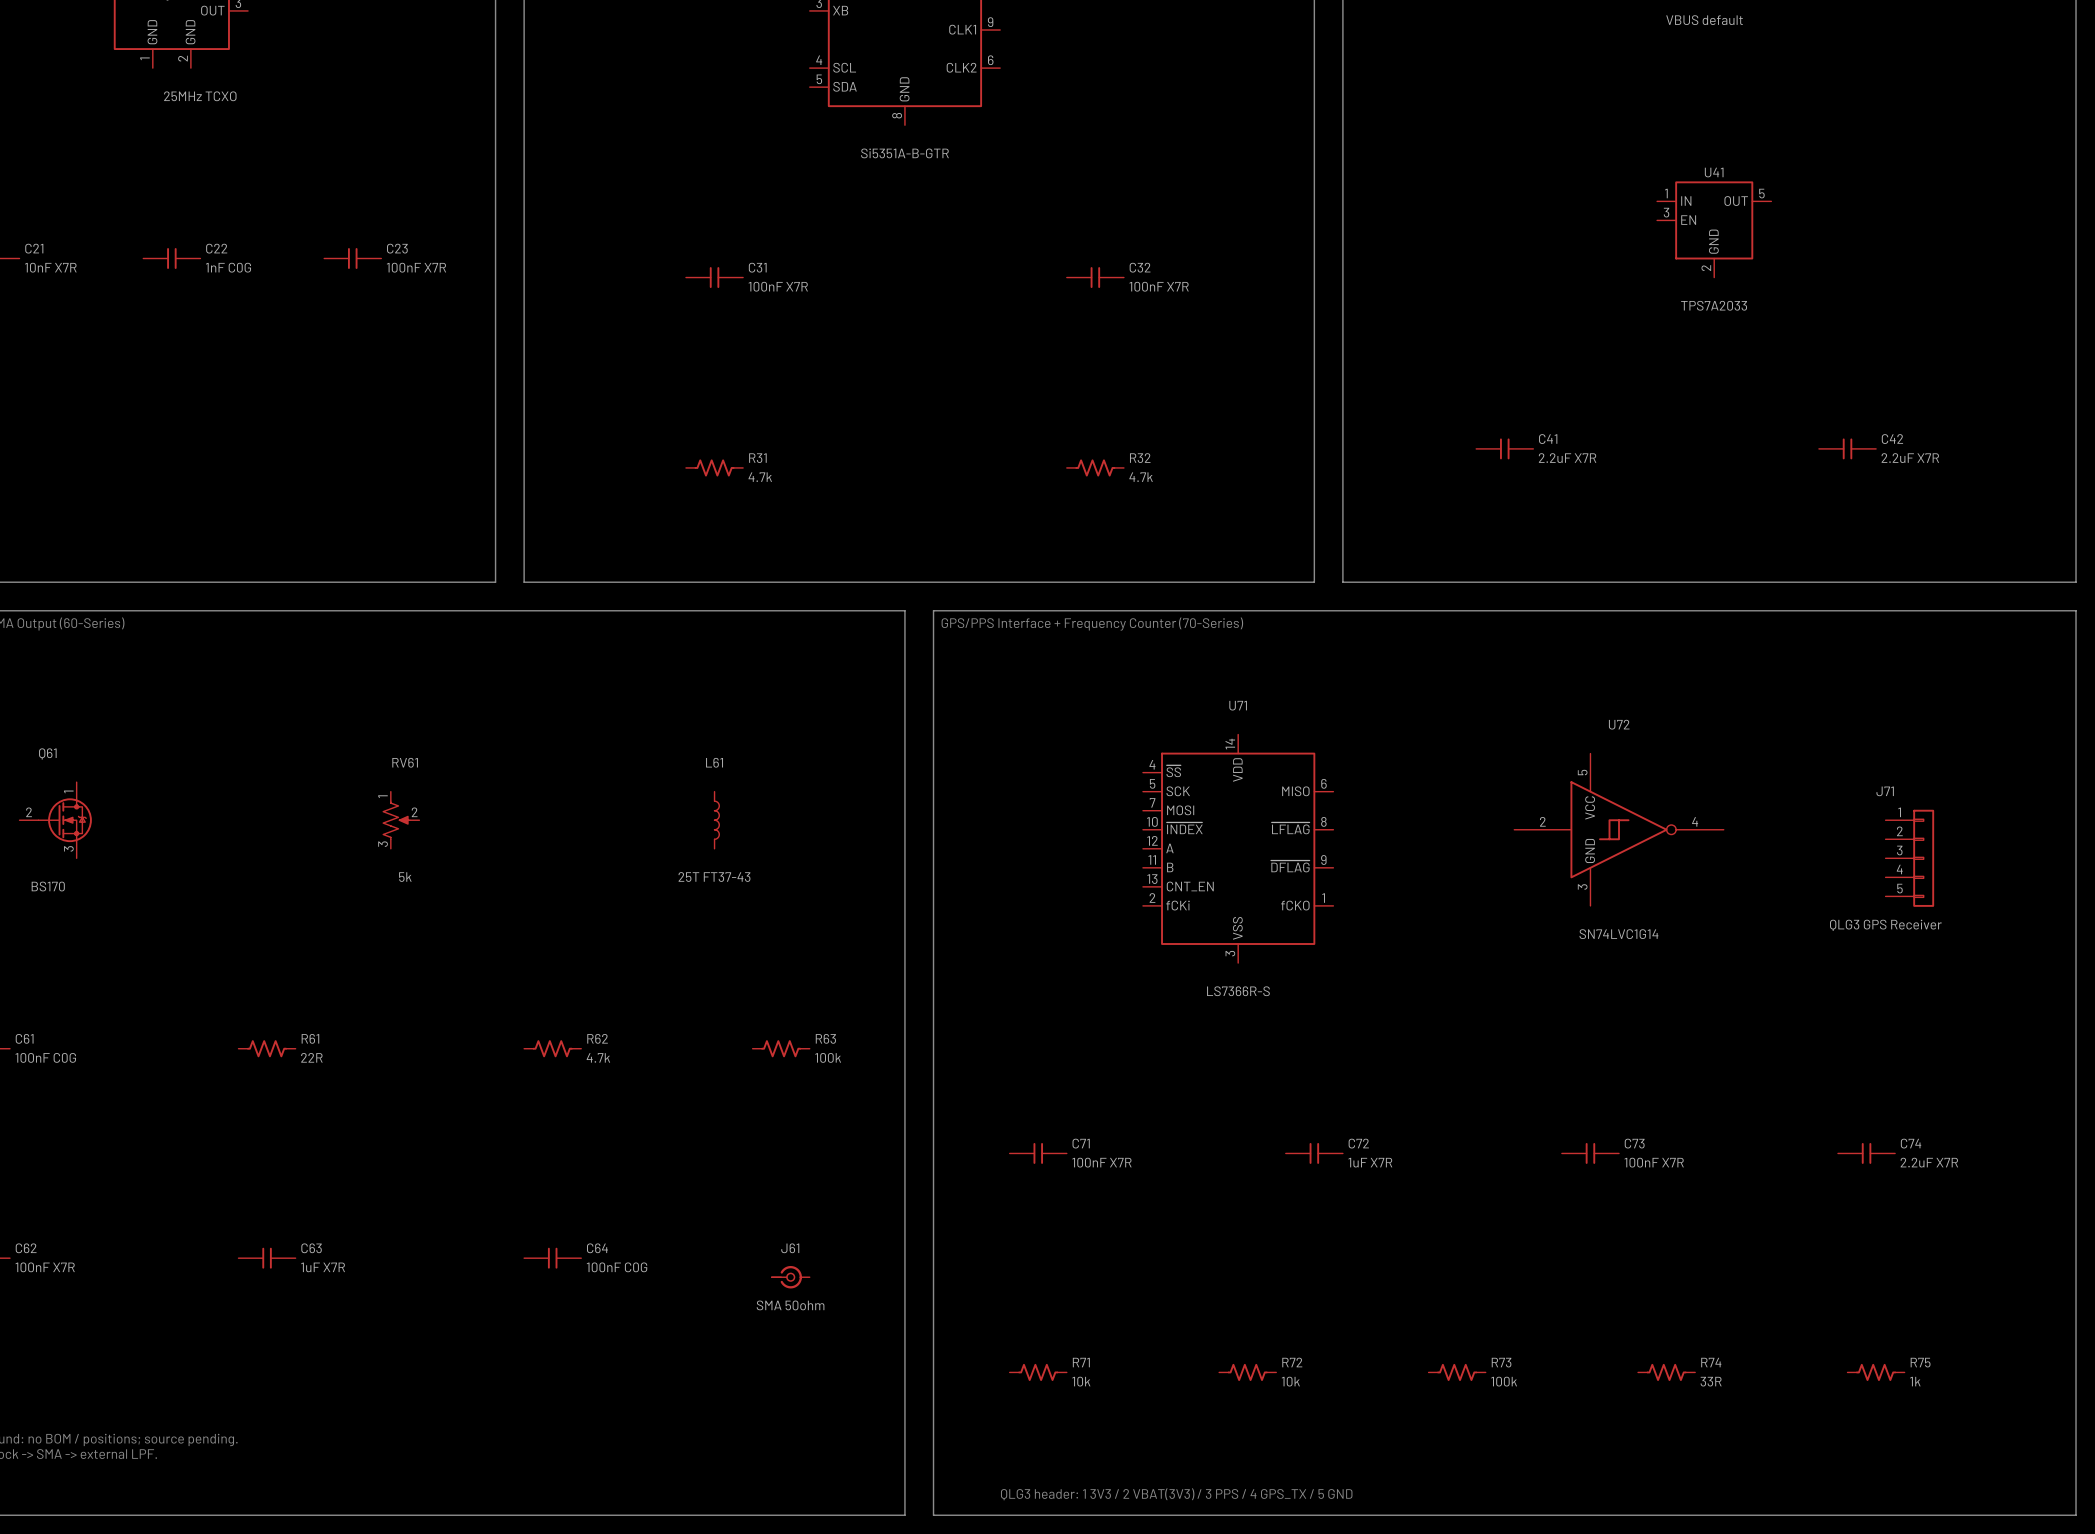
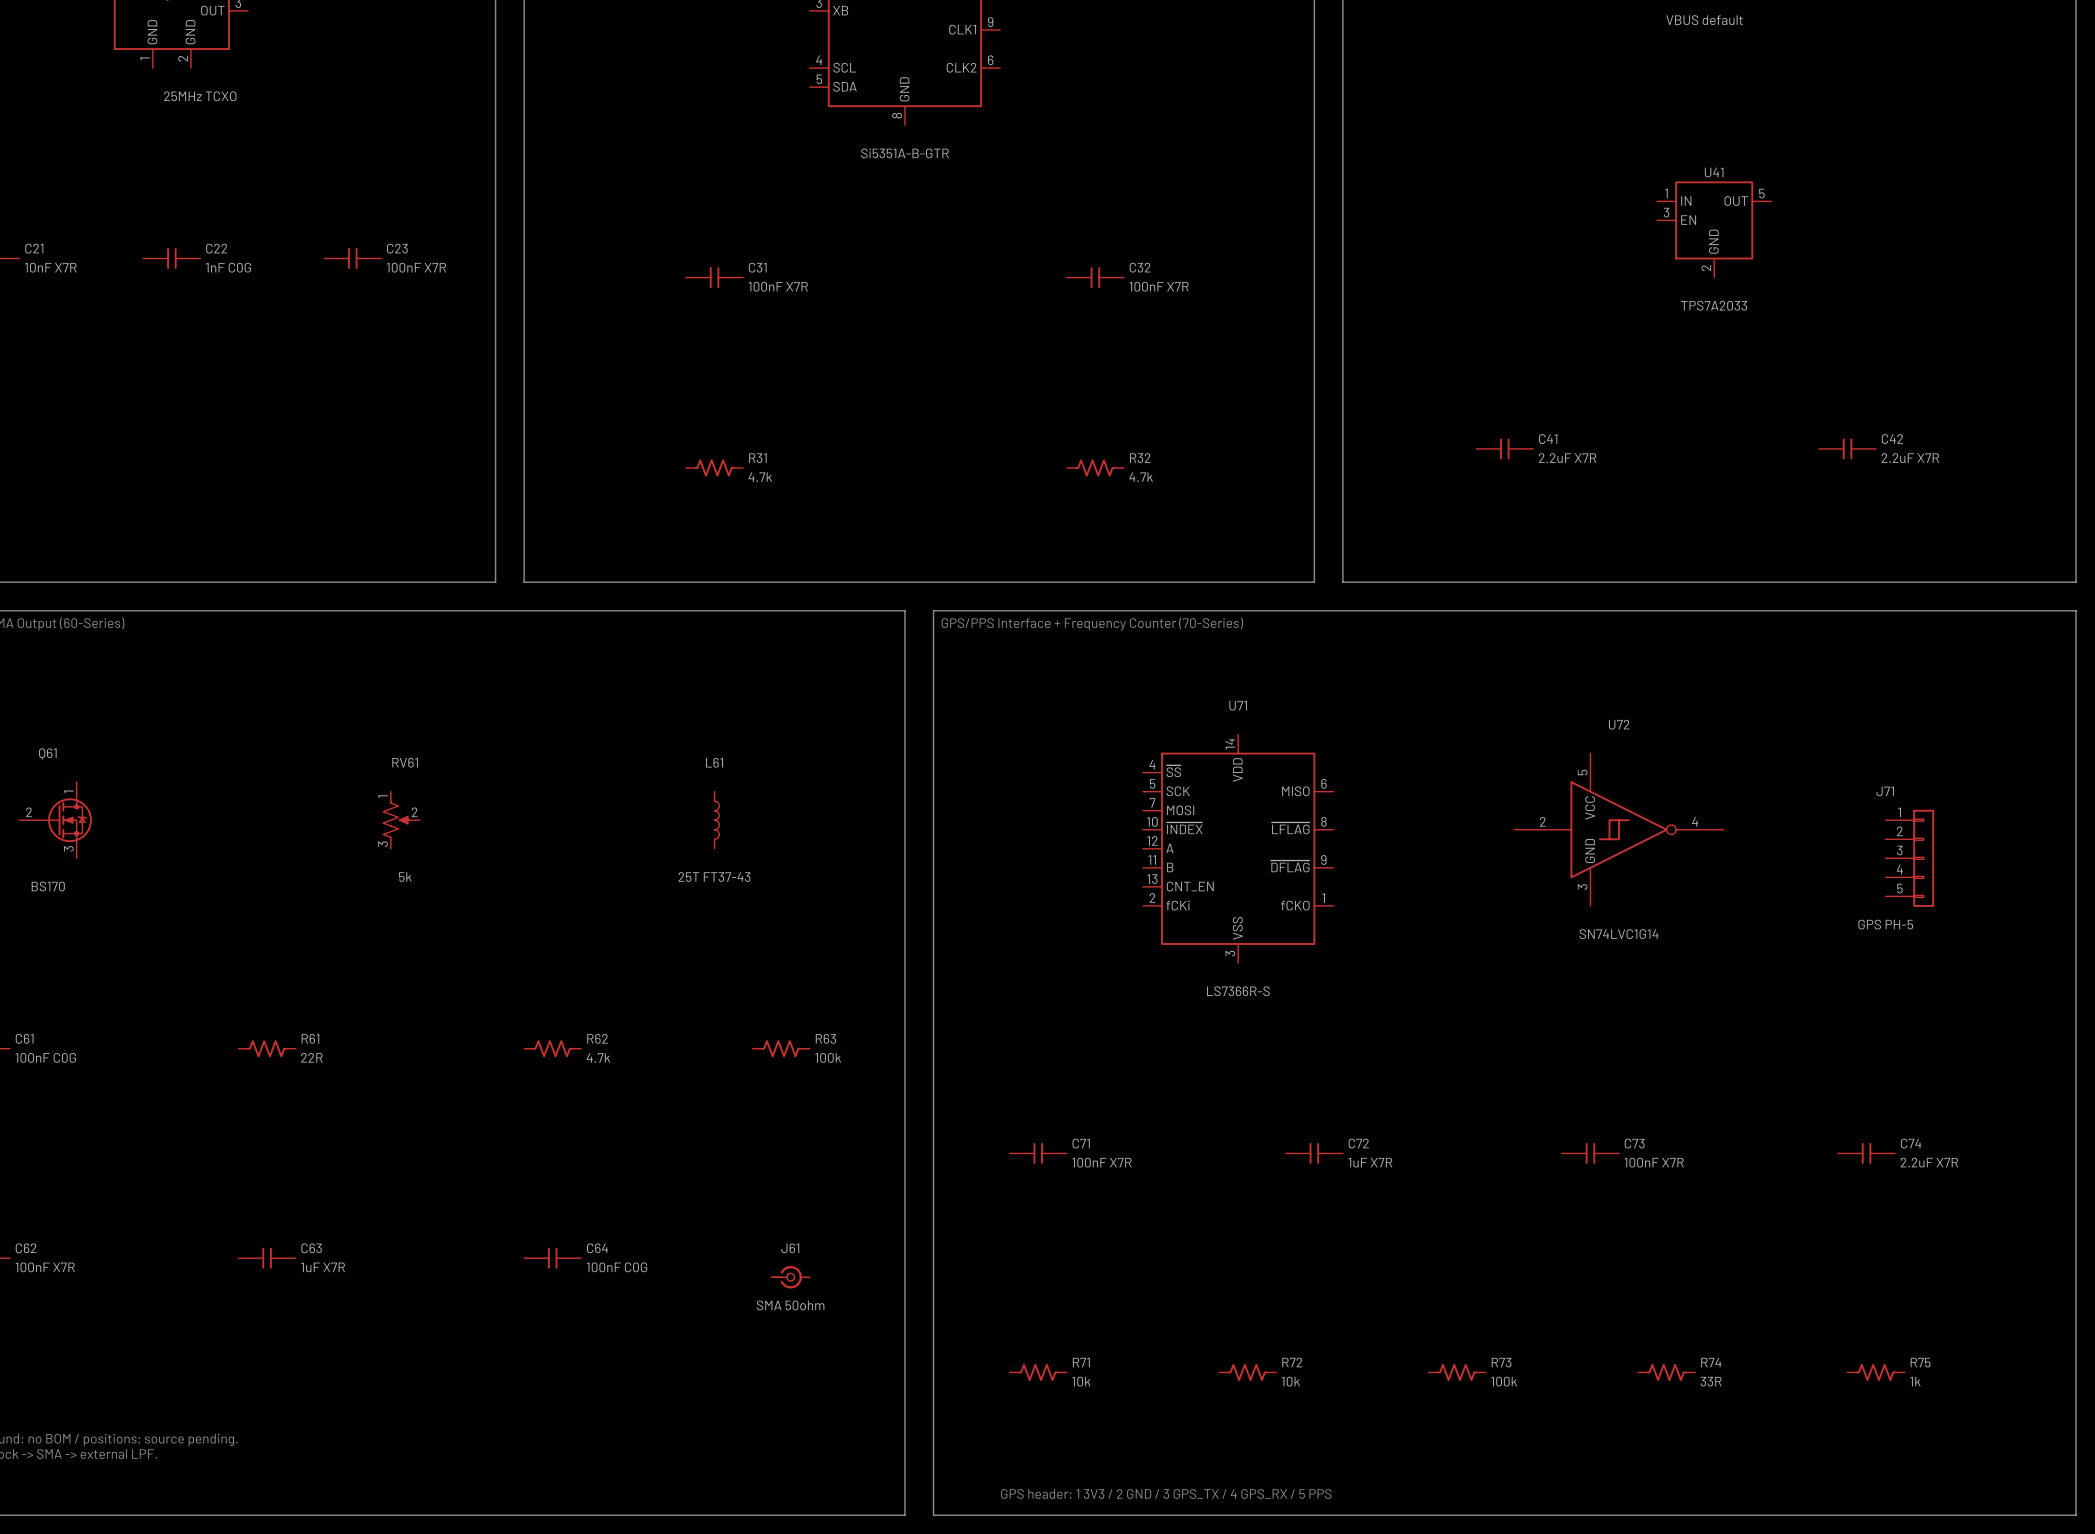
J71 value: QLG3 GPS Receiver (1885, 925) -> GPS PH-5 (1885, 924)
text: QLG3 header: 1 3V3 / 2 VBAT(3V3) / 3 PPS / 4 GPS_TX / 5 GND (1176, 1494) -> GPS header: 1 3V3 / 2 GND / 3 GPS_TX / 4 GPS_RX / 5 PPS (1166, 1493)

